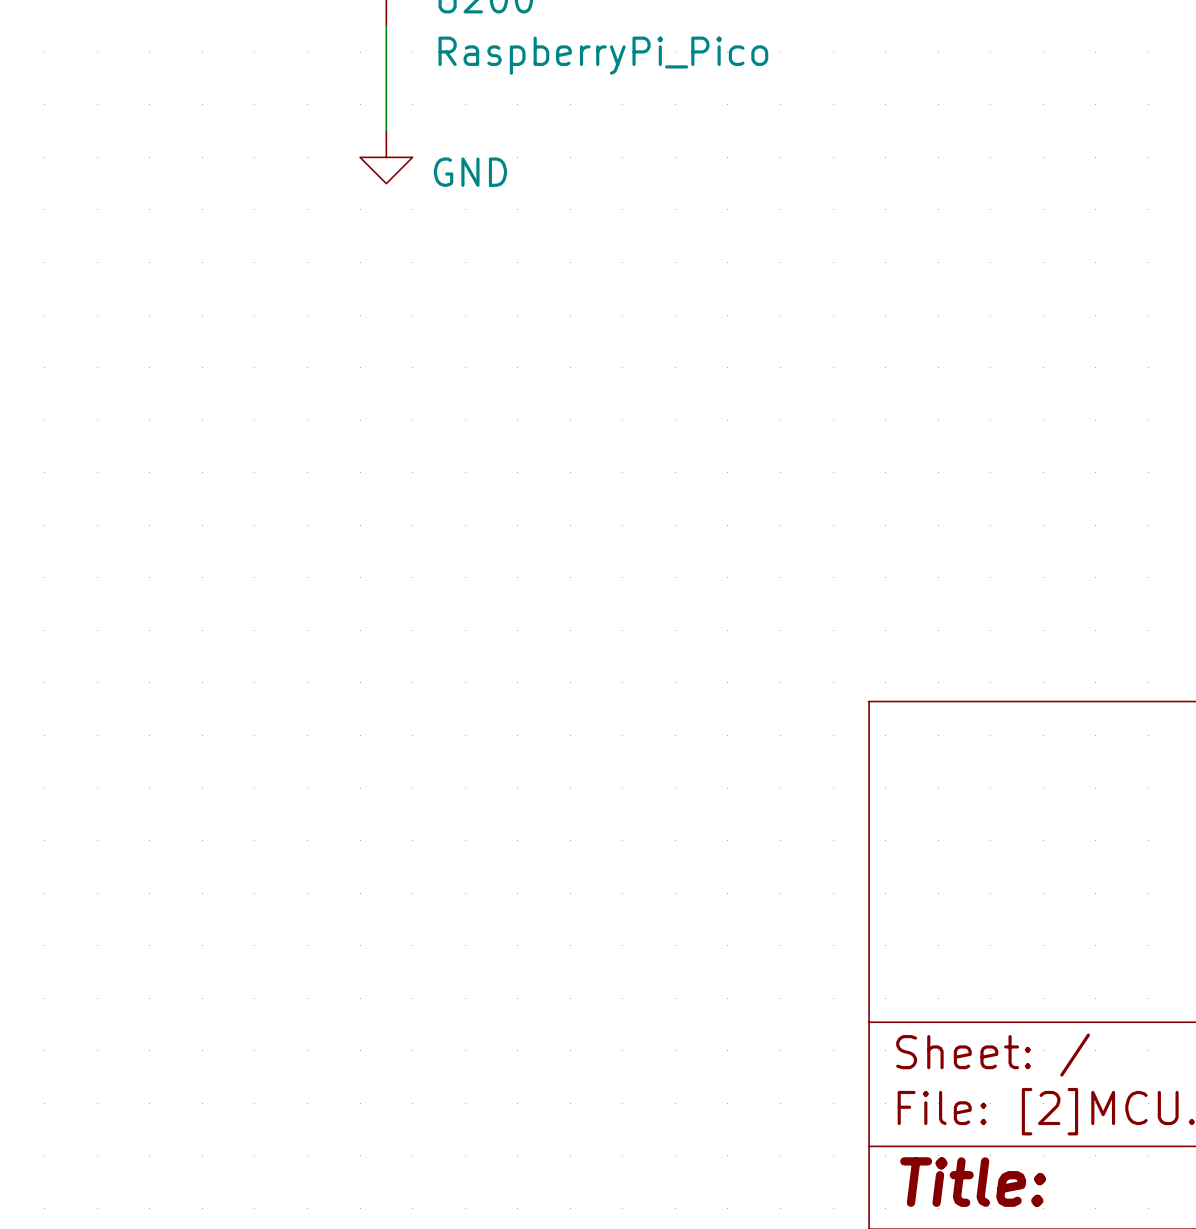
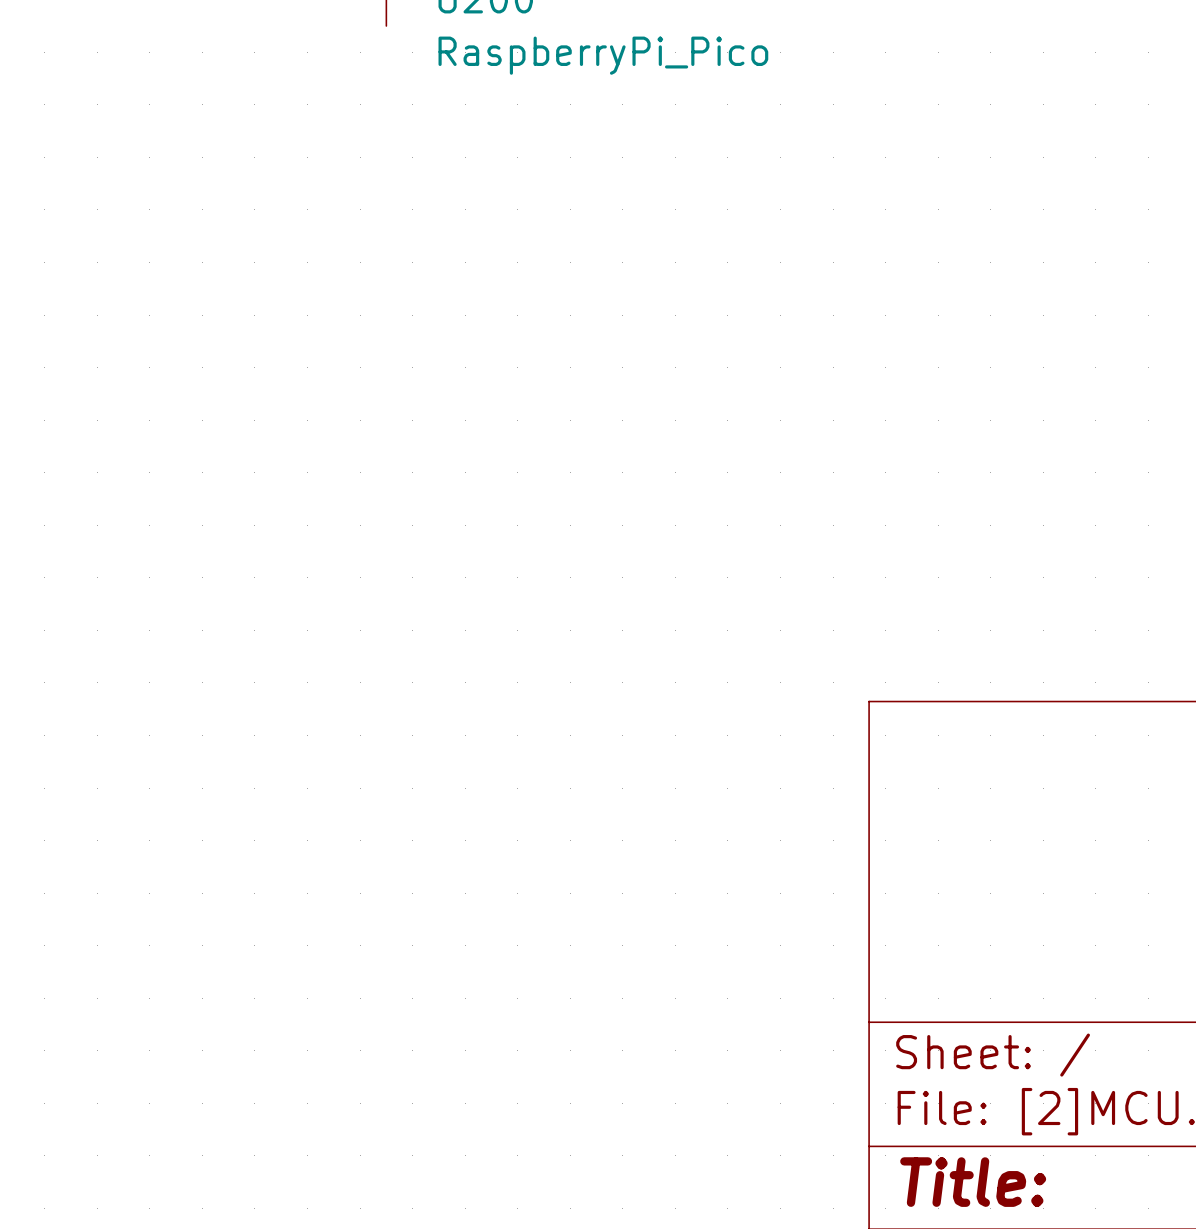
wire: (386, 25) (386, 131) -> none
power symbol: GND (386, 157) -> none

